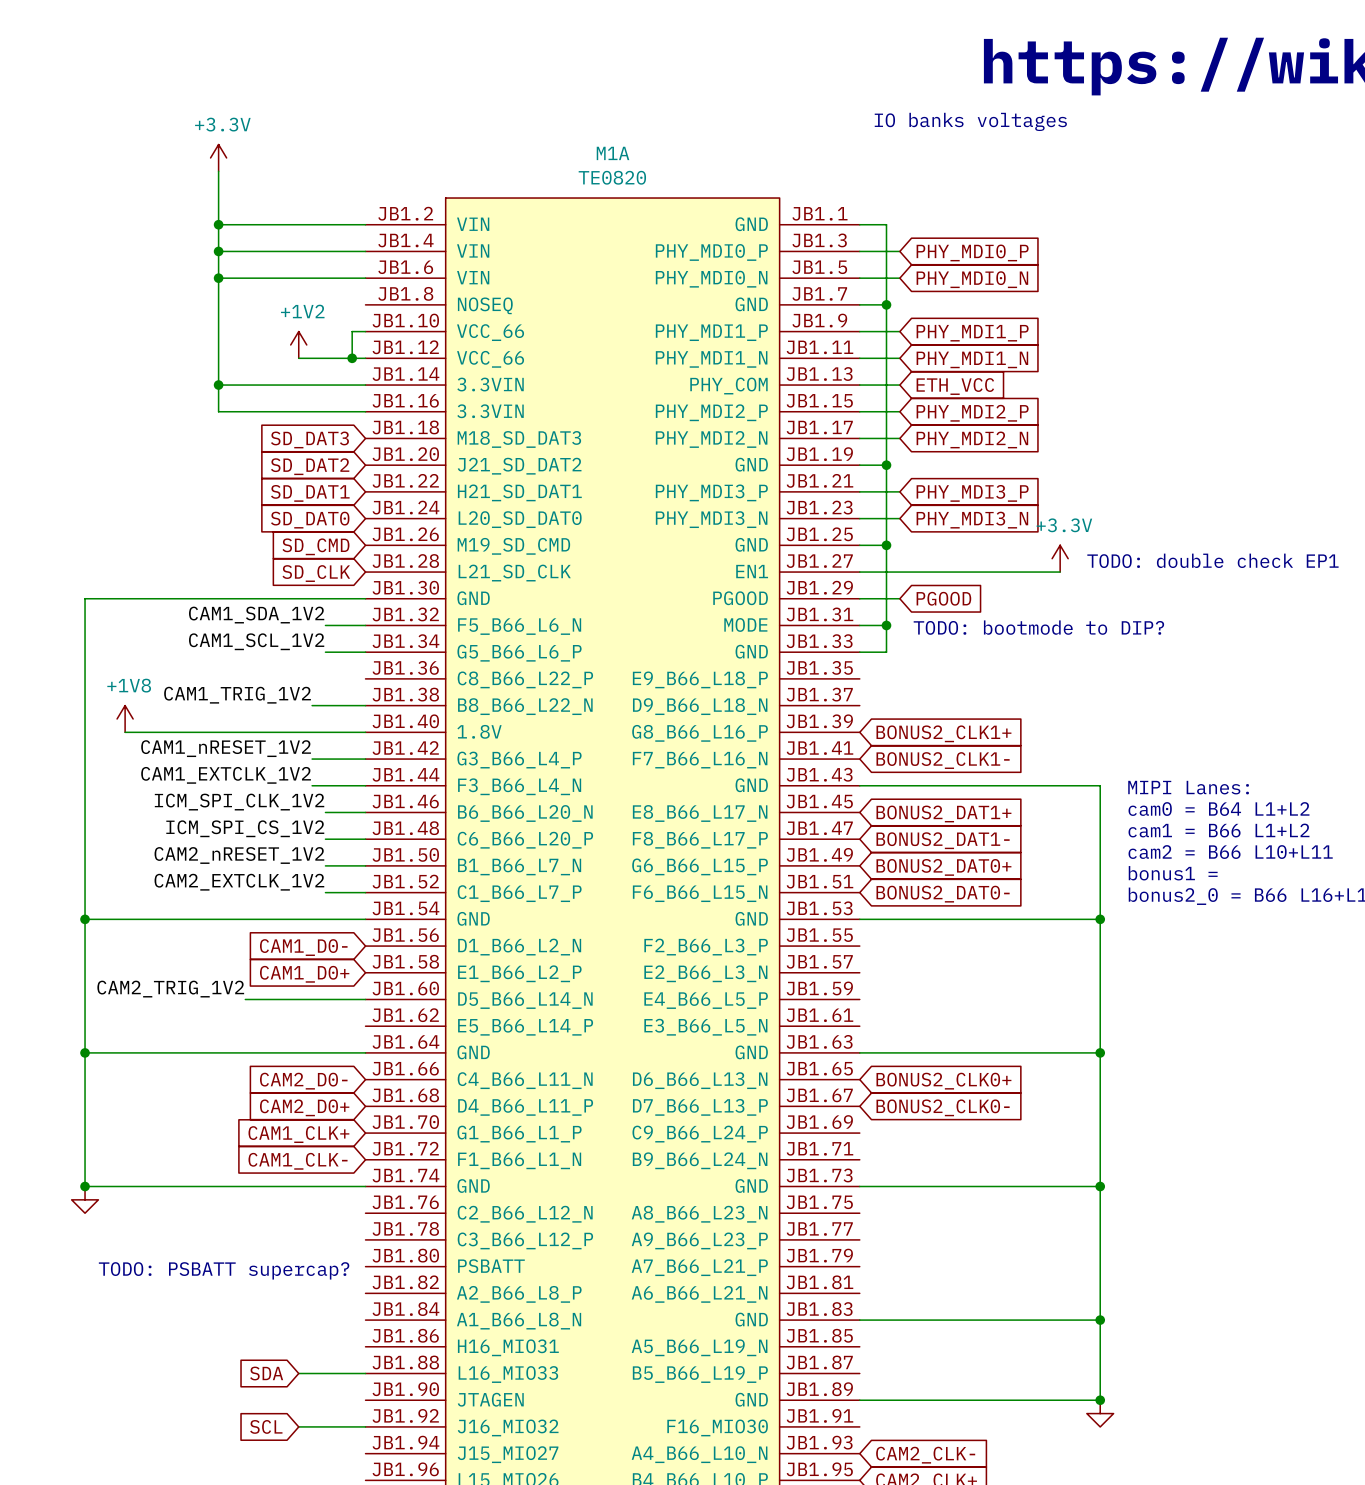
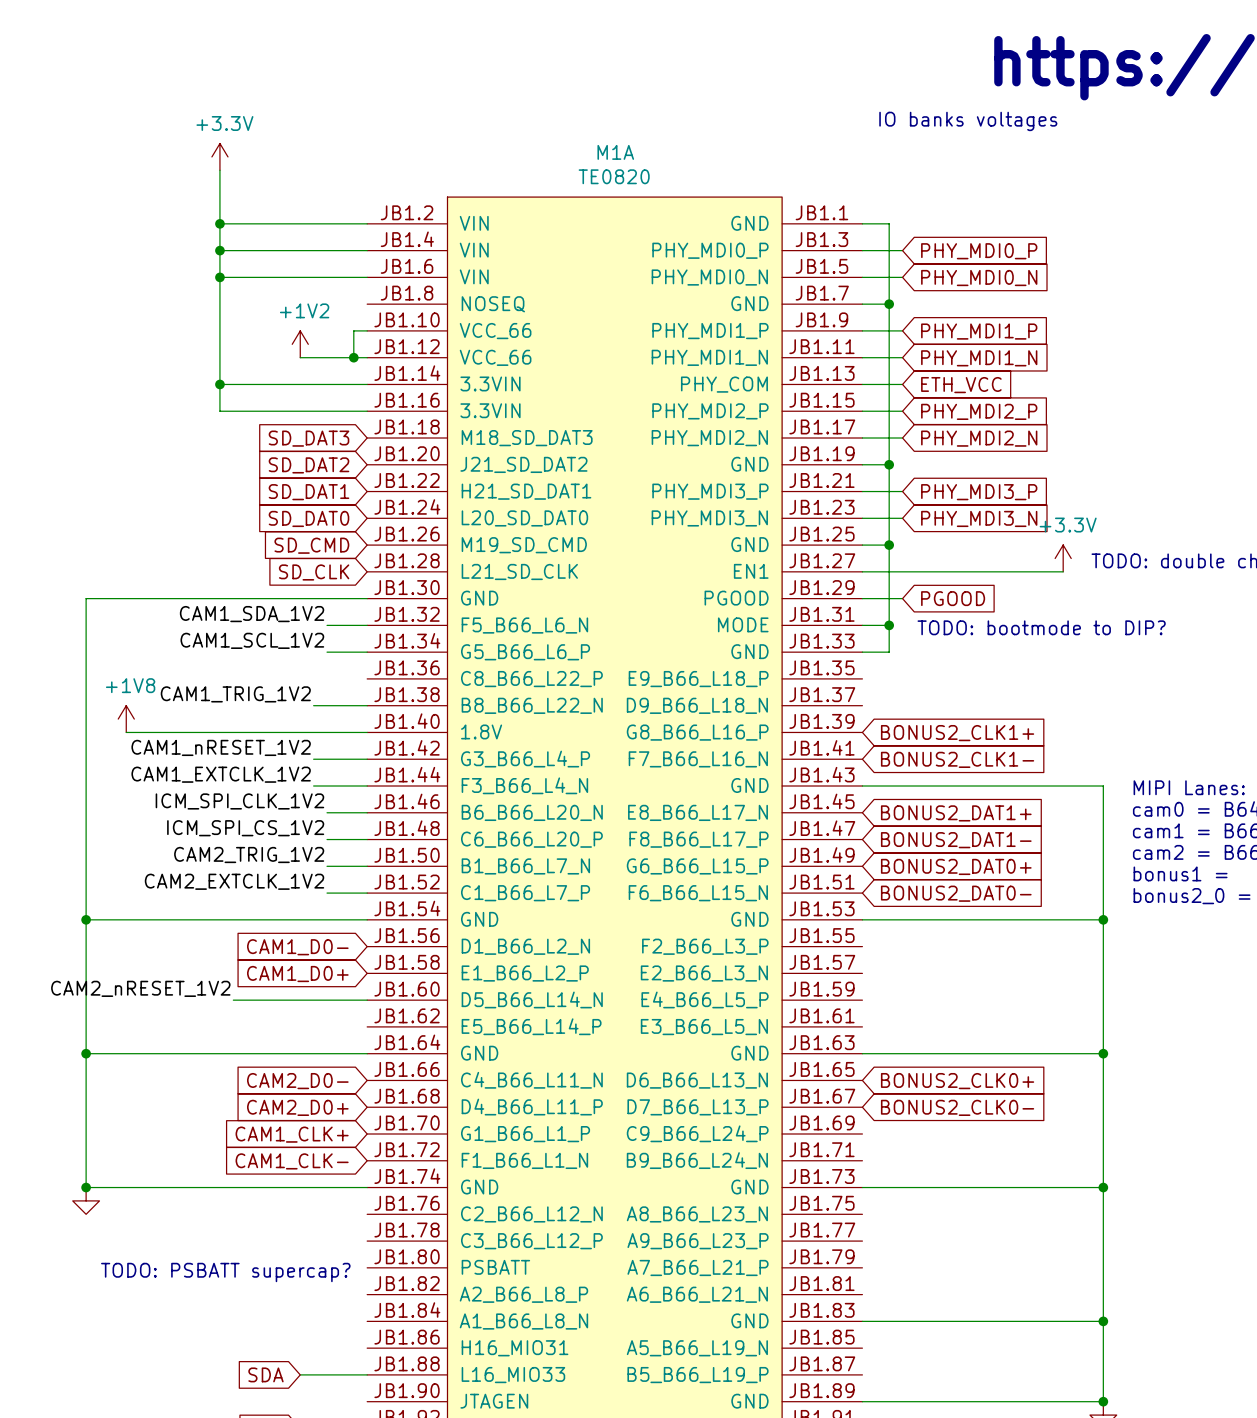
label: CAM2_nRESET_1V2 (239, 855) -> CAM2_TRIG_1V2 (249, 855)
label: CAM2_TRIG_1V2 (170, 989) -> CAM2_nRESET_1V2 (140, 988)
wire: none -> (233, 1000) (246, 1000)

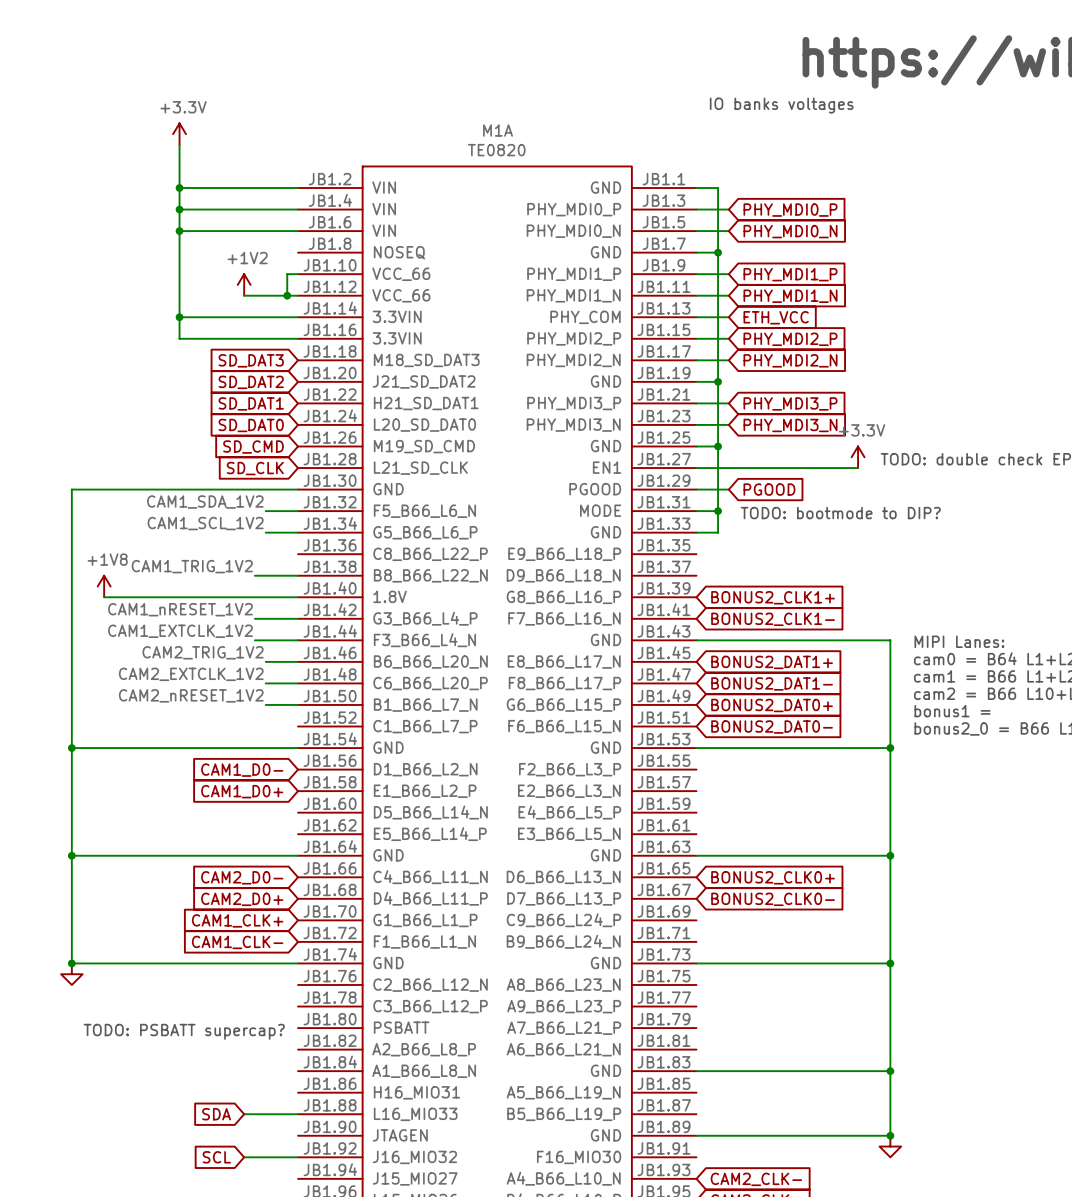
label: ICM_SPI_CLK_1V2 (239, 801) -> CAM2_TRIG_1V2 (203, 652)
label: ICM_SPI_CS_1V2 (245, 828) -> CAM2_EXTCLK_1V2 (191, 674)
label: CAM2_TRIG_1V2 (249, 855) -> CAM2_nRESET_1V2 (191, 695)
label: CAM2_EXTCLK_1V2 (234, 881) -> none
wire: (327, 893) (367, 893) -> none
label: CAM2_nRESET_1V2 (140, 988) -> none
wire: (233, 1000) (367, 1000) -> none

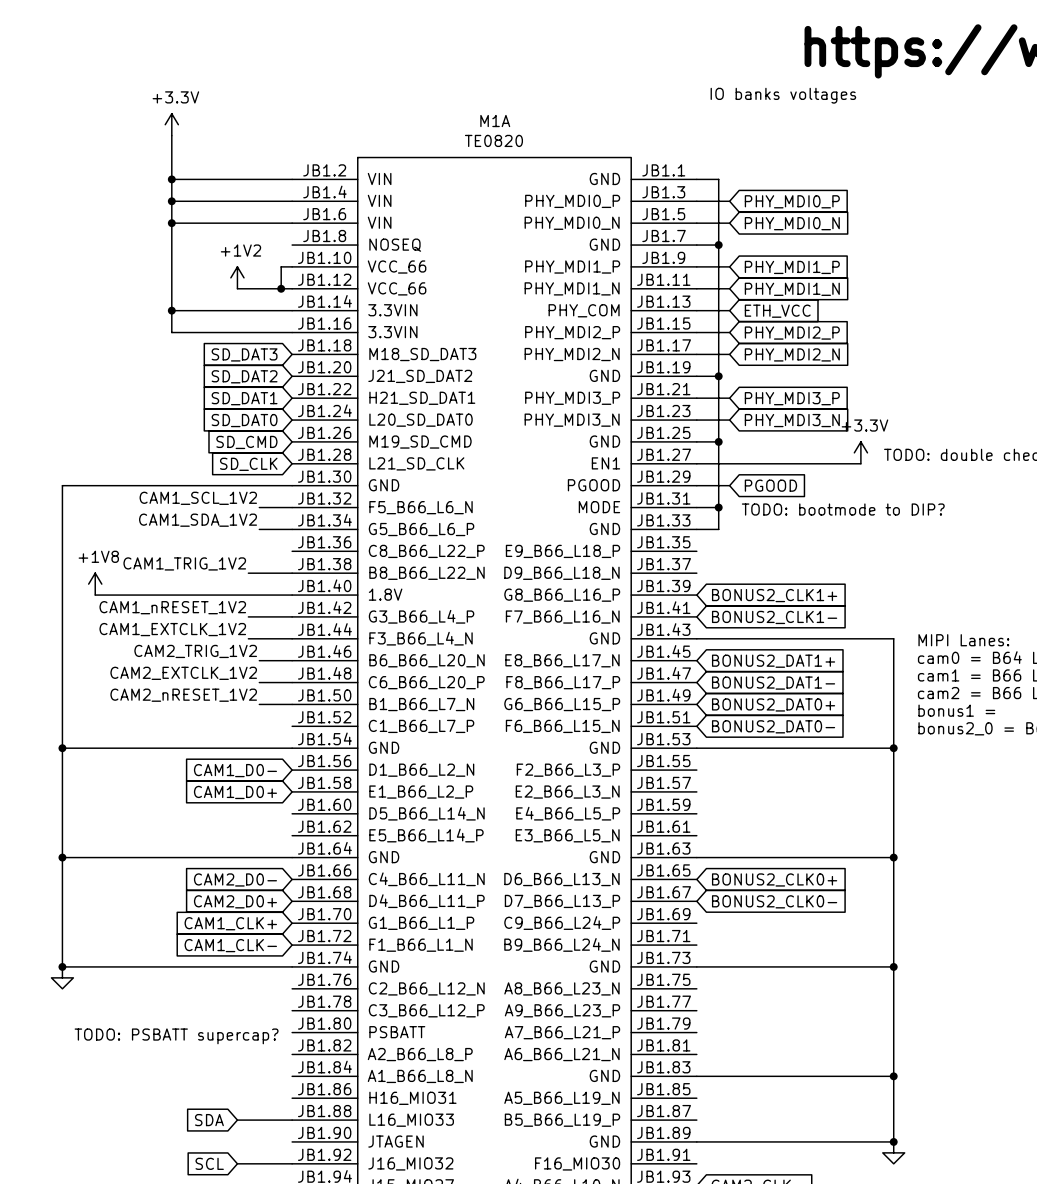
label: CAM1_SDA_1V2 (205, 502) -> CAM1_SCL_1V2 (198, 498)
label: CAM1_SCL_1V2 (205, 523) -> CAM1_SDA_1V2 (198, 520)

